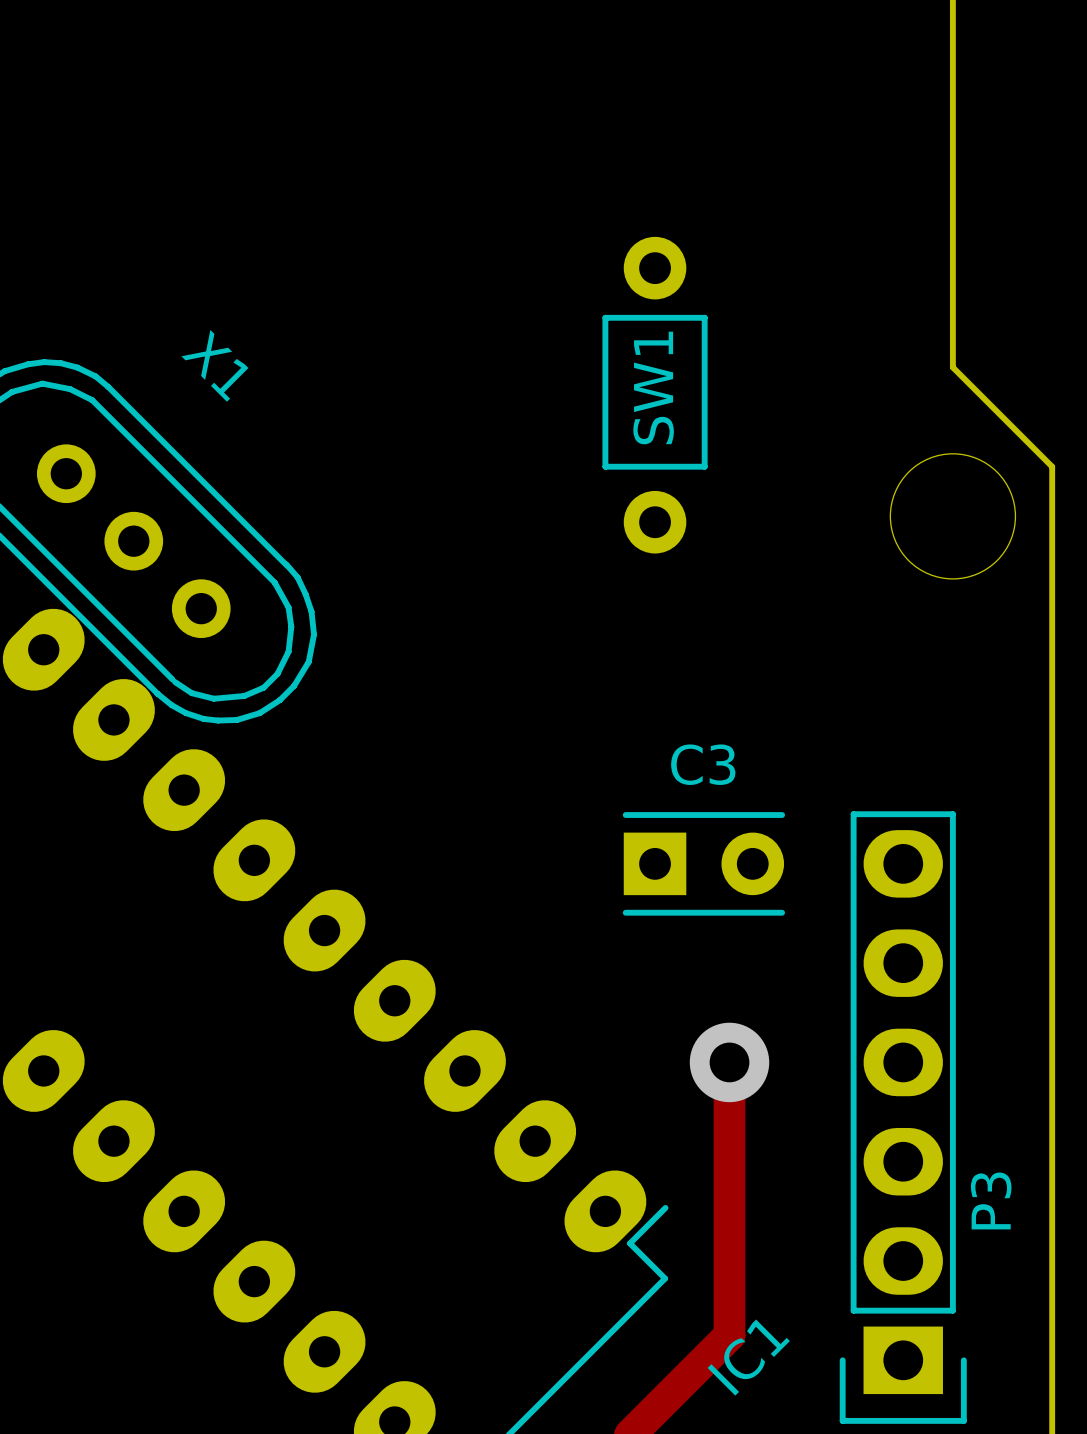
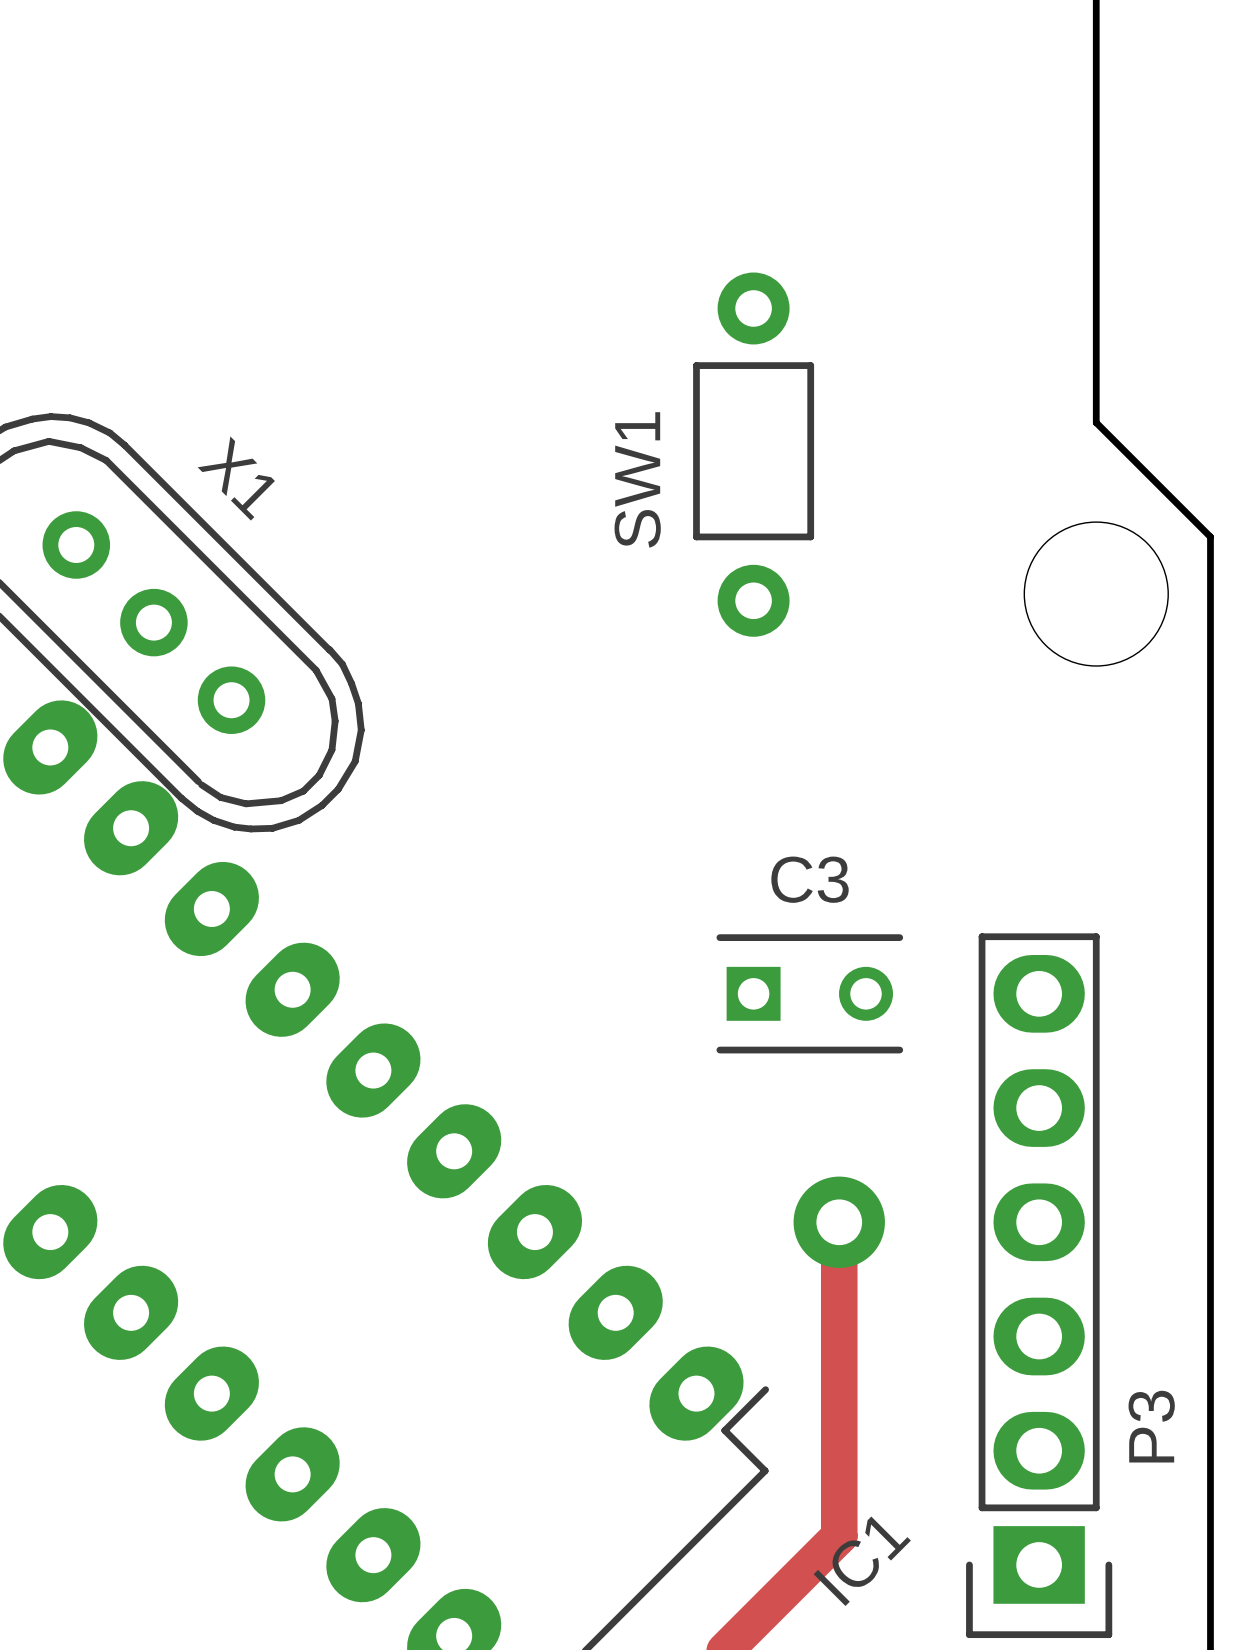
X1 name position: X1 (214, 365) -> X1 (236, 478)
SW1 name position: SW1 (653, 388) -> SW1 (637, 479)
C3 footprint: [622, 812, 786, 916] -> [716, 934, 904, 1054]
P3 name position: P3 (991, 1200) -> P3 (1151, 1426)

